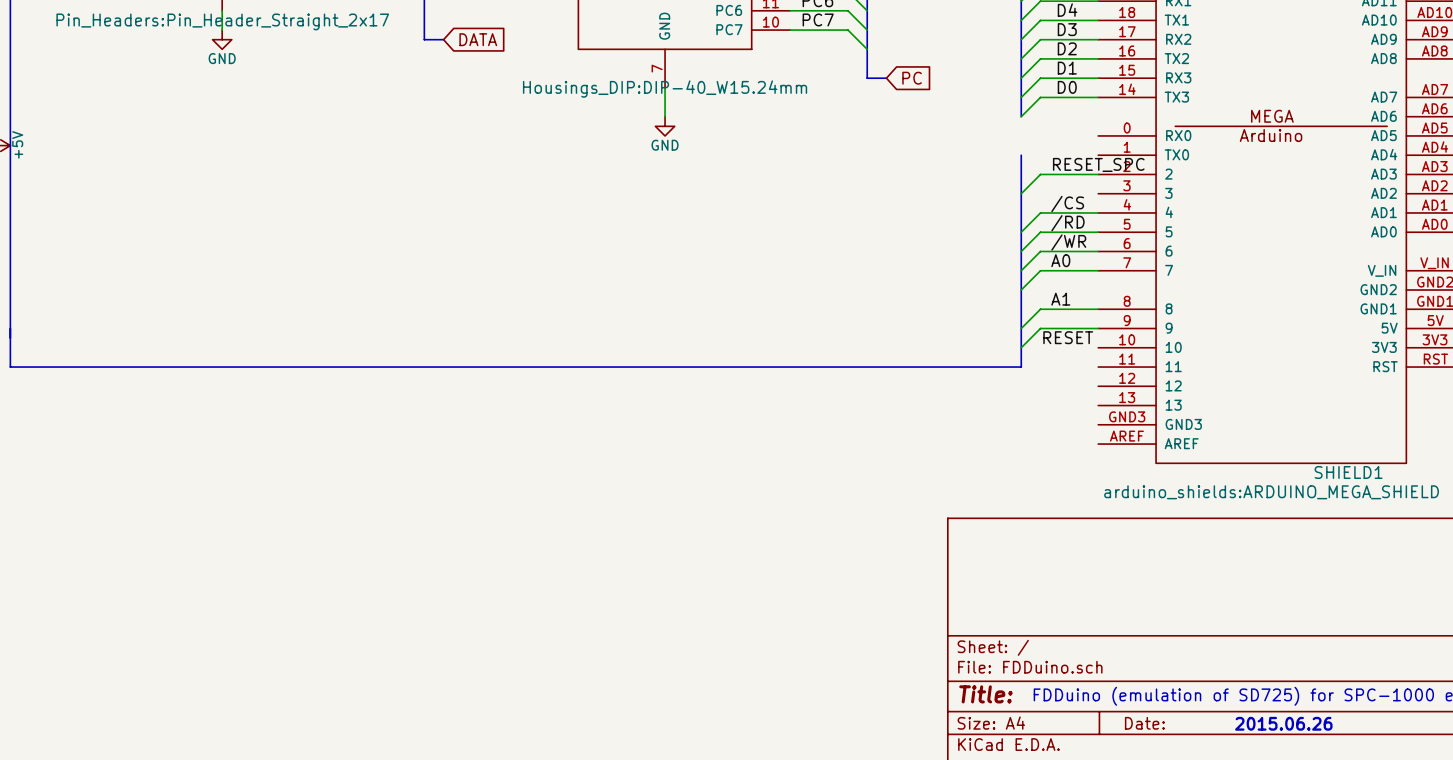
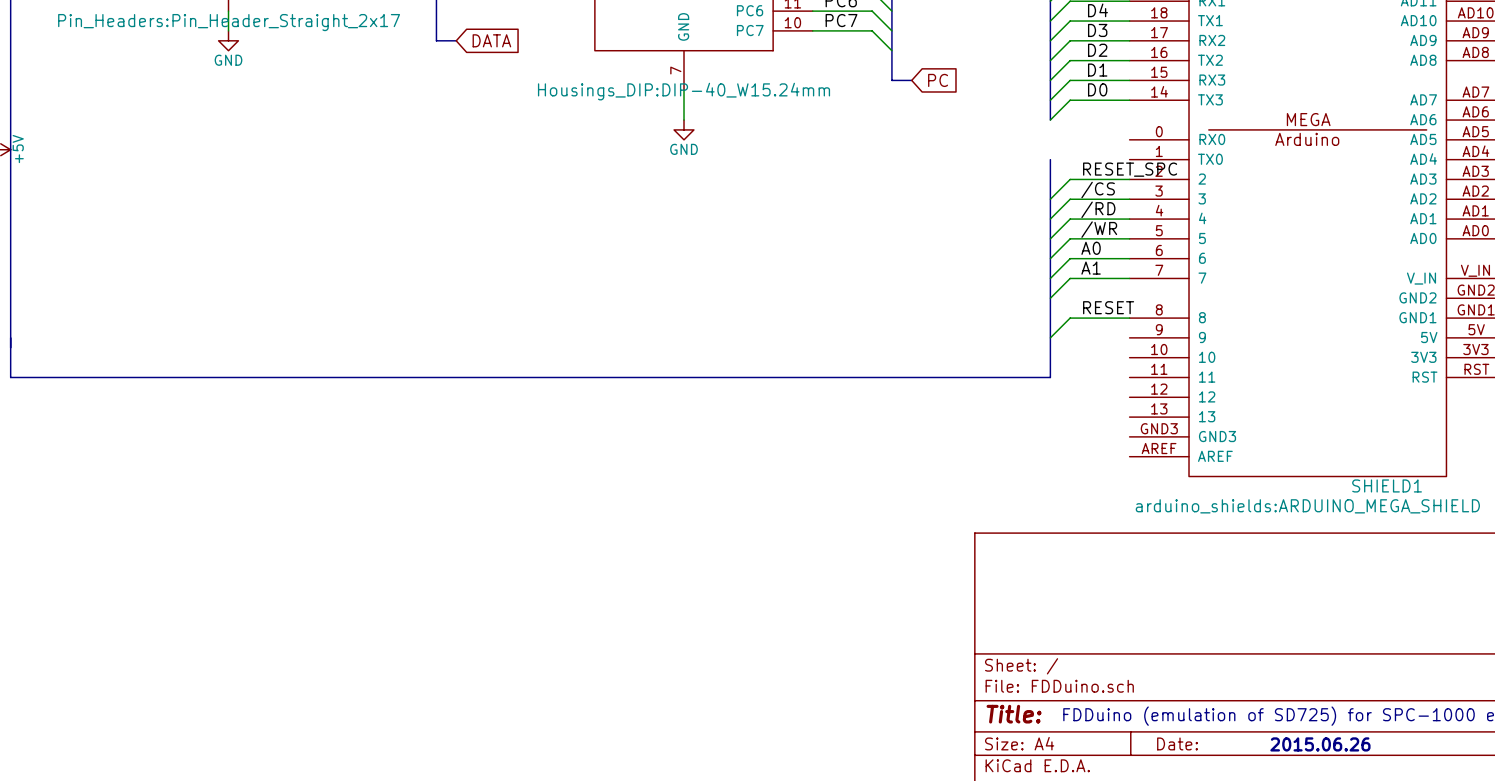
label: none -> /CS (1098, 190)
label: /CS (1067, 204) -> /RD (1098, 209)
label: /RD (1067, 223) -> /WR (1099, 229)
label: /WR (1068, 242) -> A0 (1091, 248)
label: A0 (1060, 260) -> A1 (1091, 268)
label: A1 (1060, 299) -> RESET (1108, 307)
wire: (1098, 328) (1040, 328) (1021, 347) -> (1129, 199) (1070, 199) (1050, 219)
label: RESET (1068, 337) -> none

